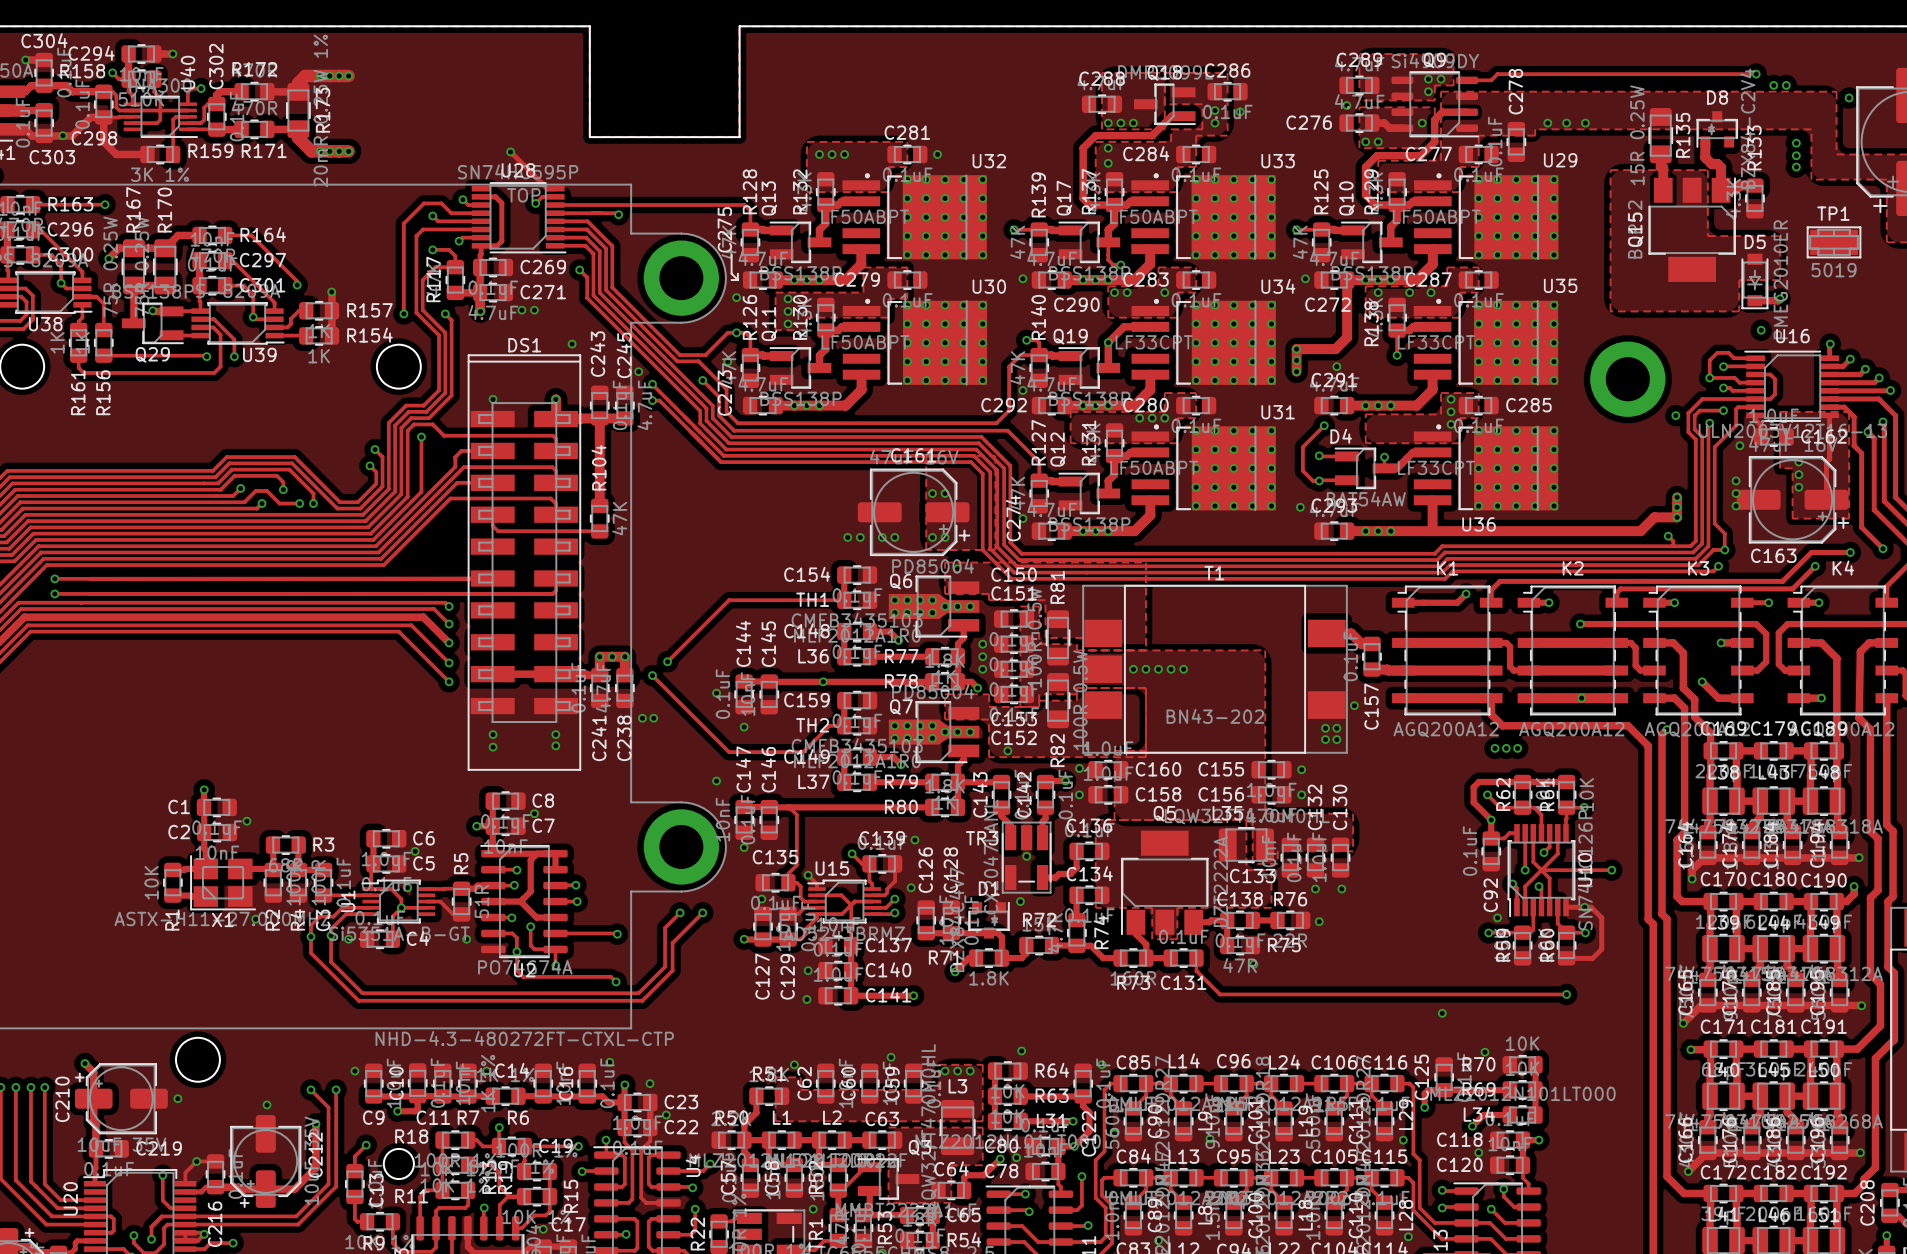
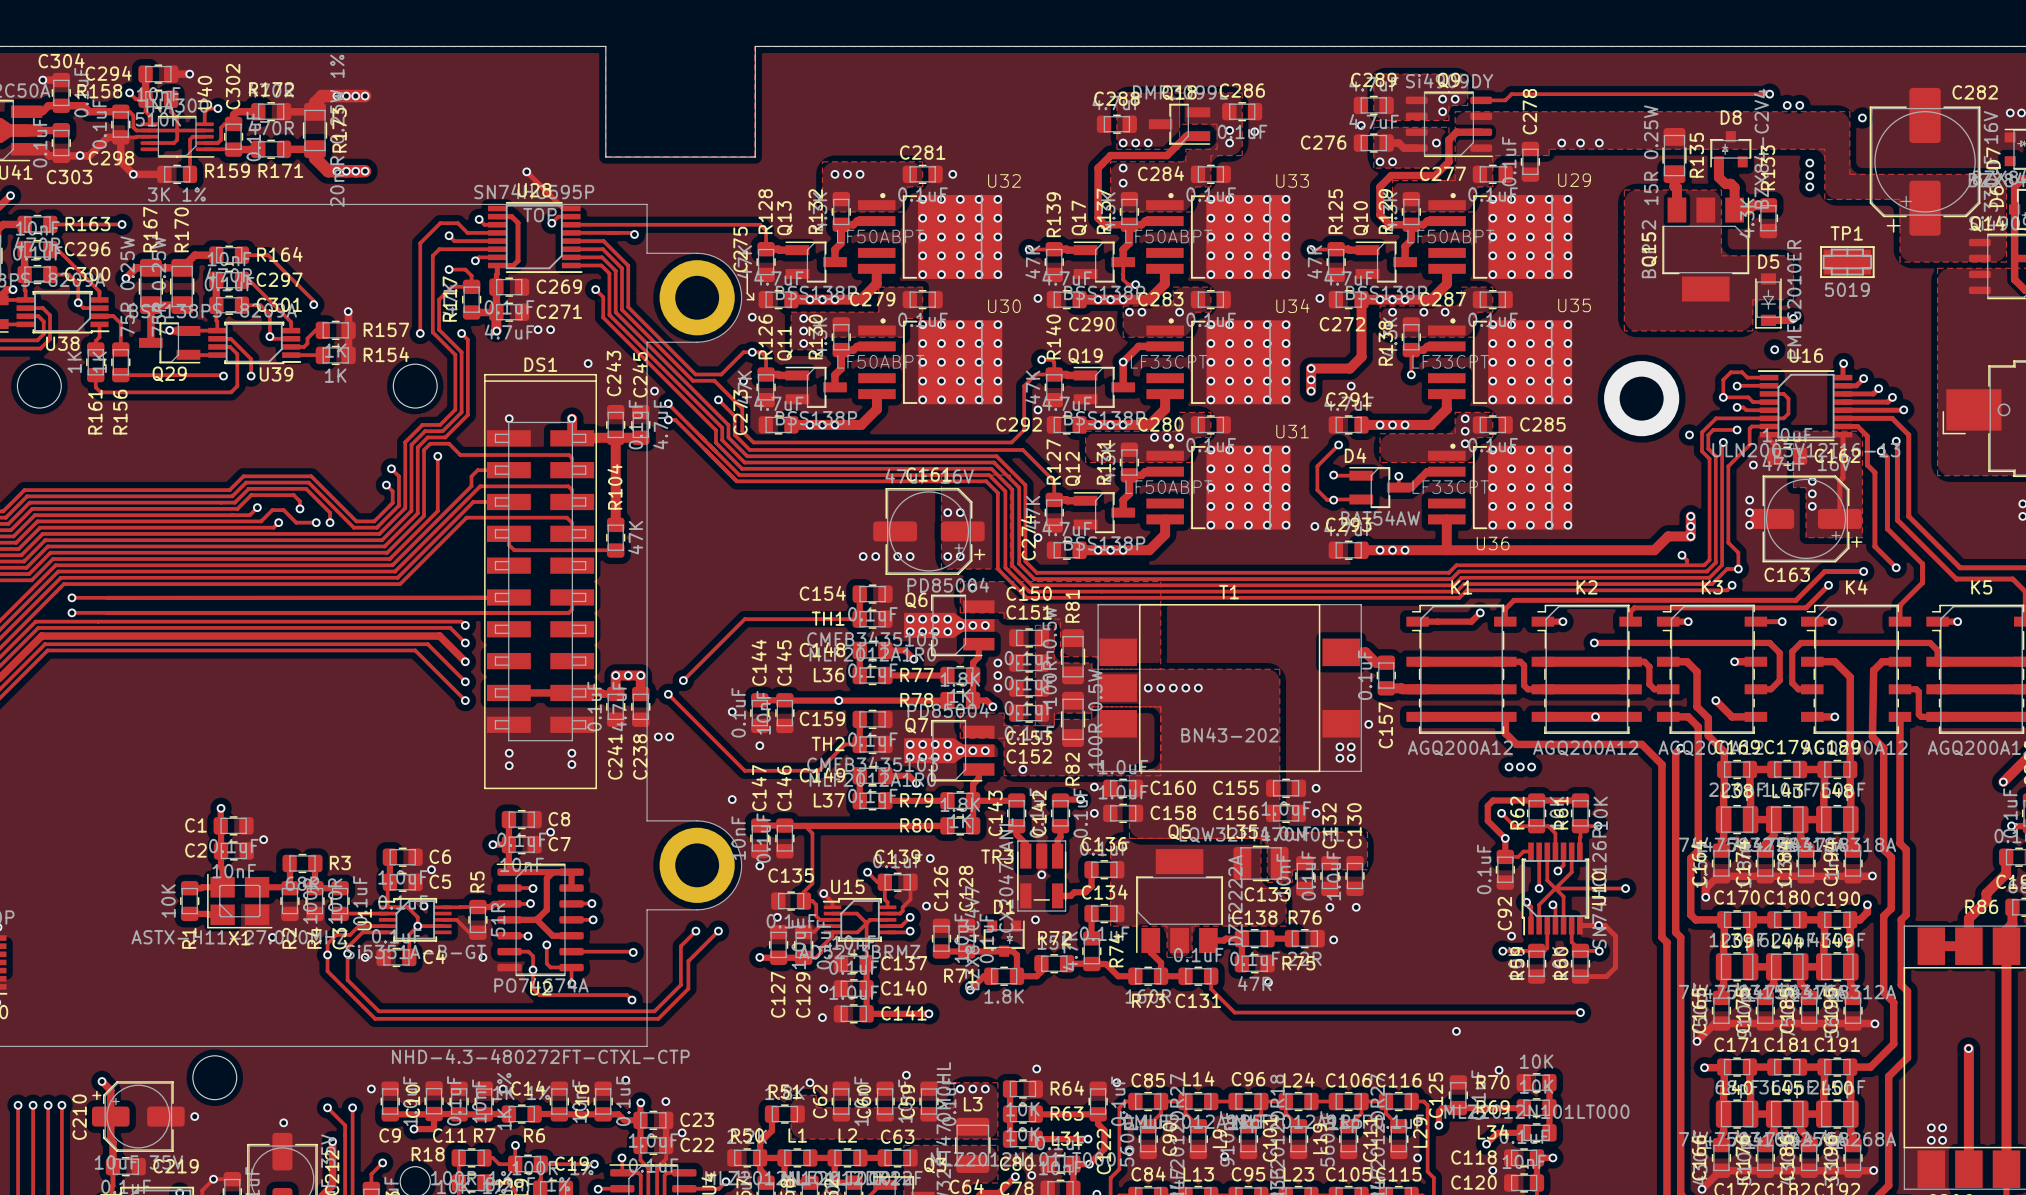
via: none -> (133, 174)

